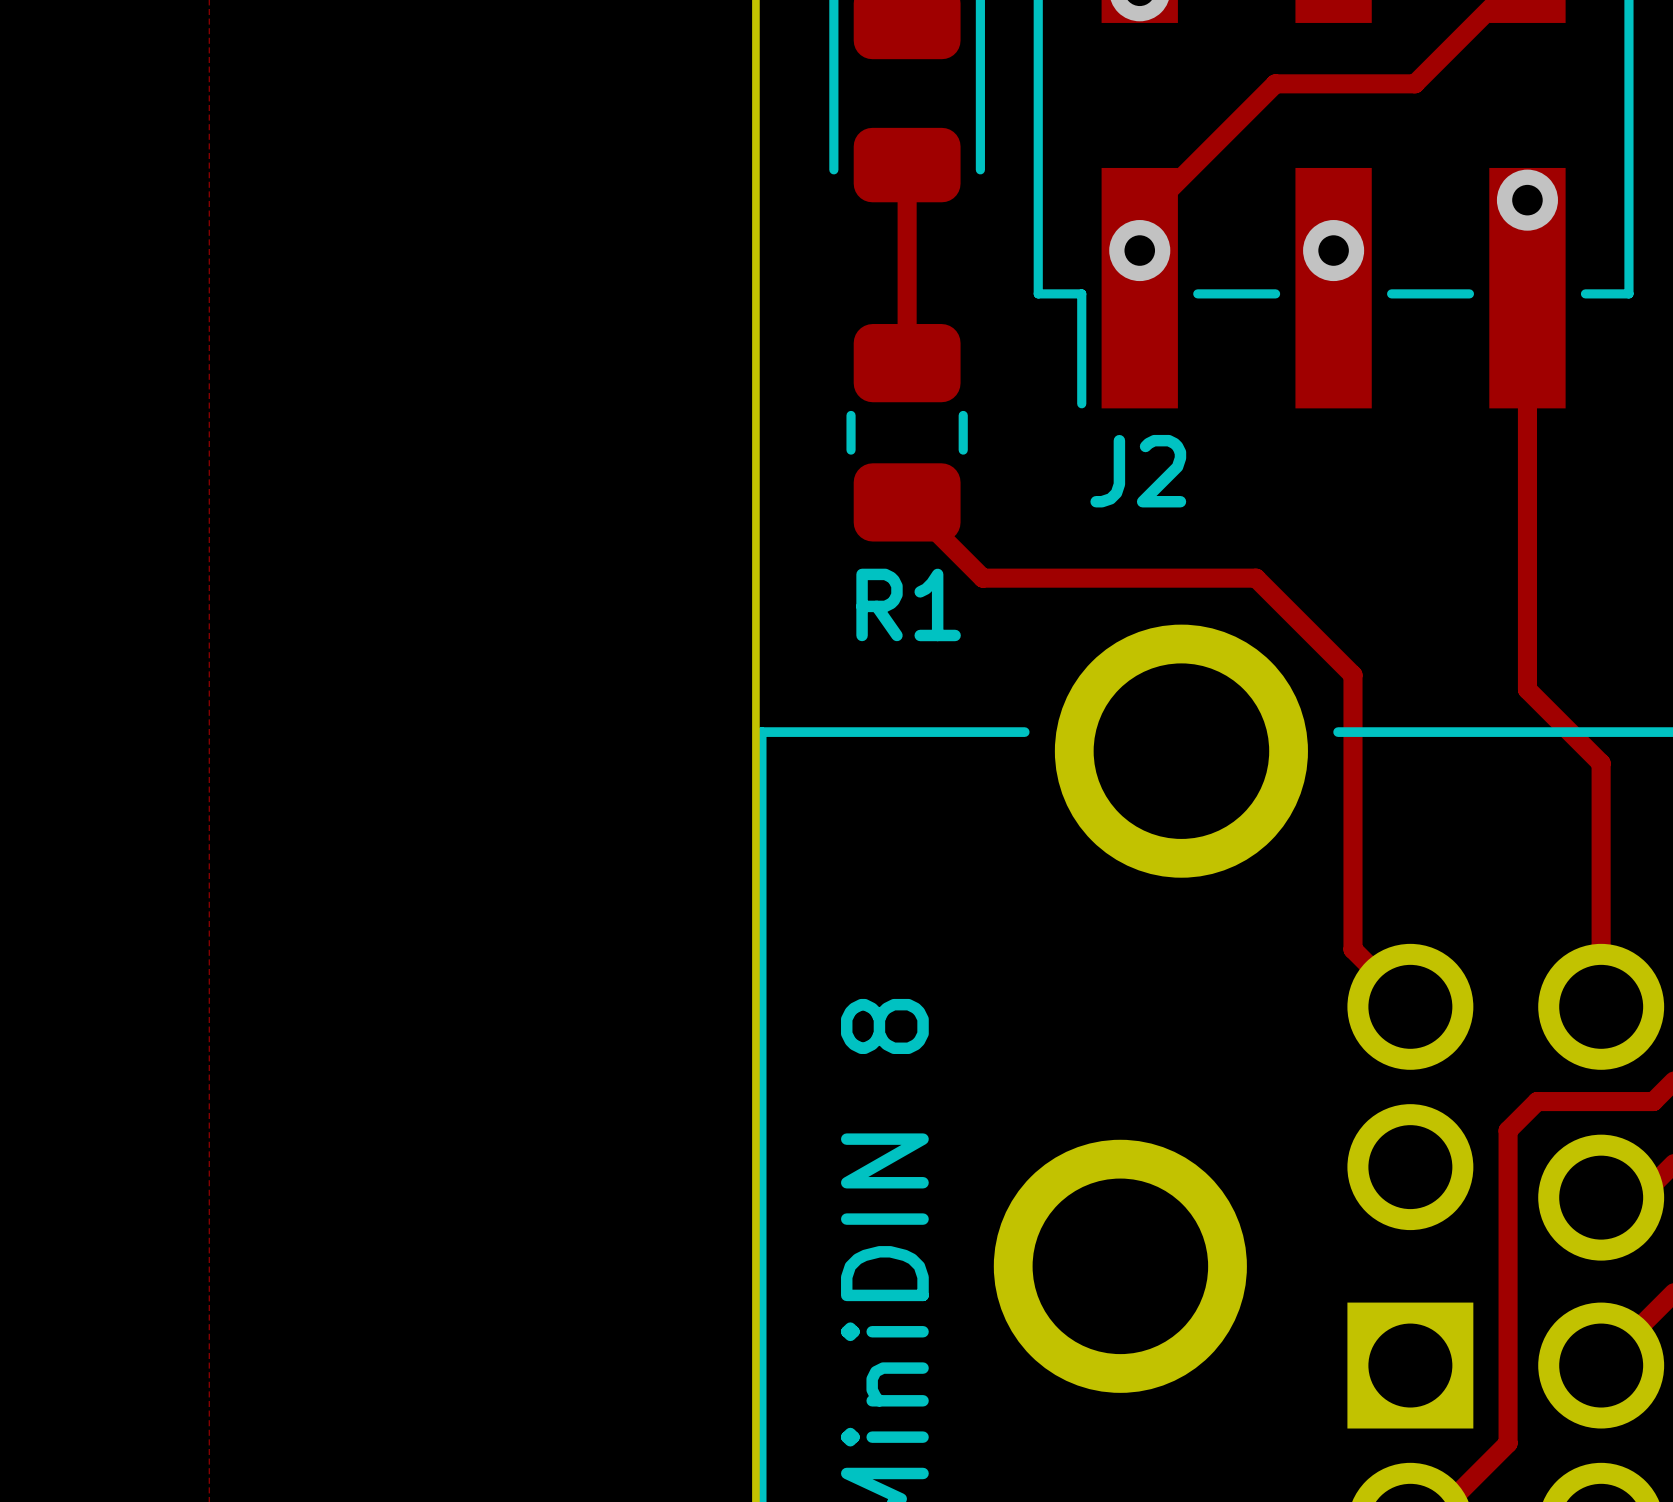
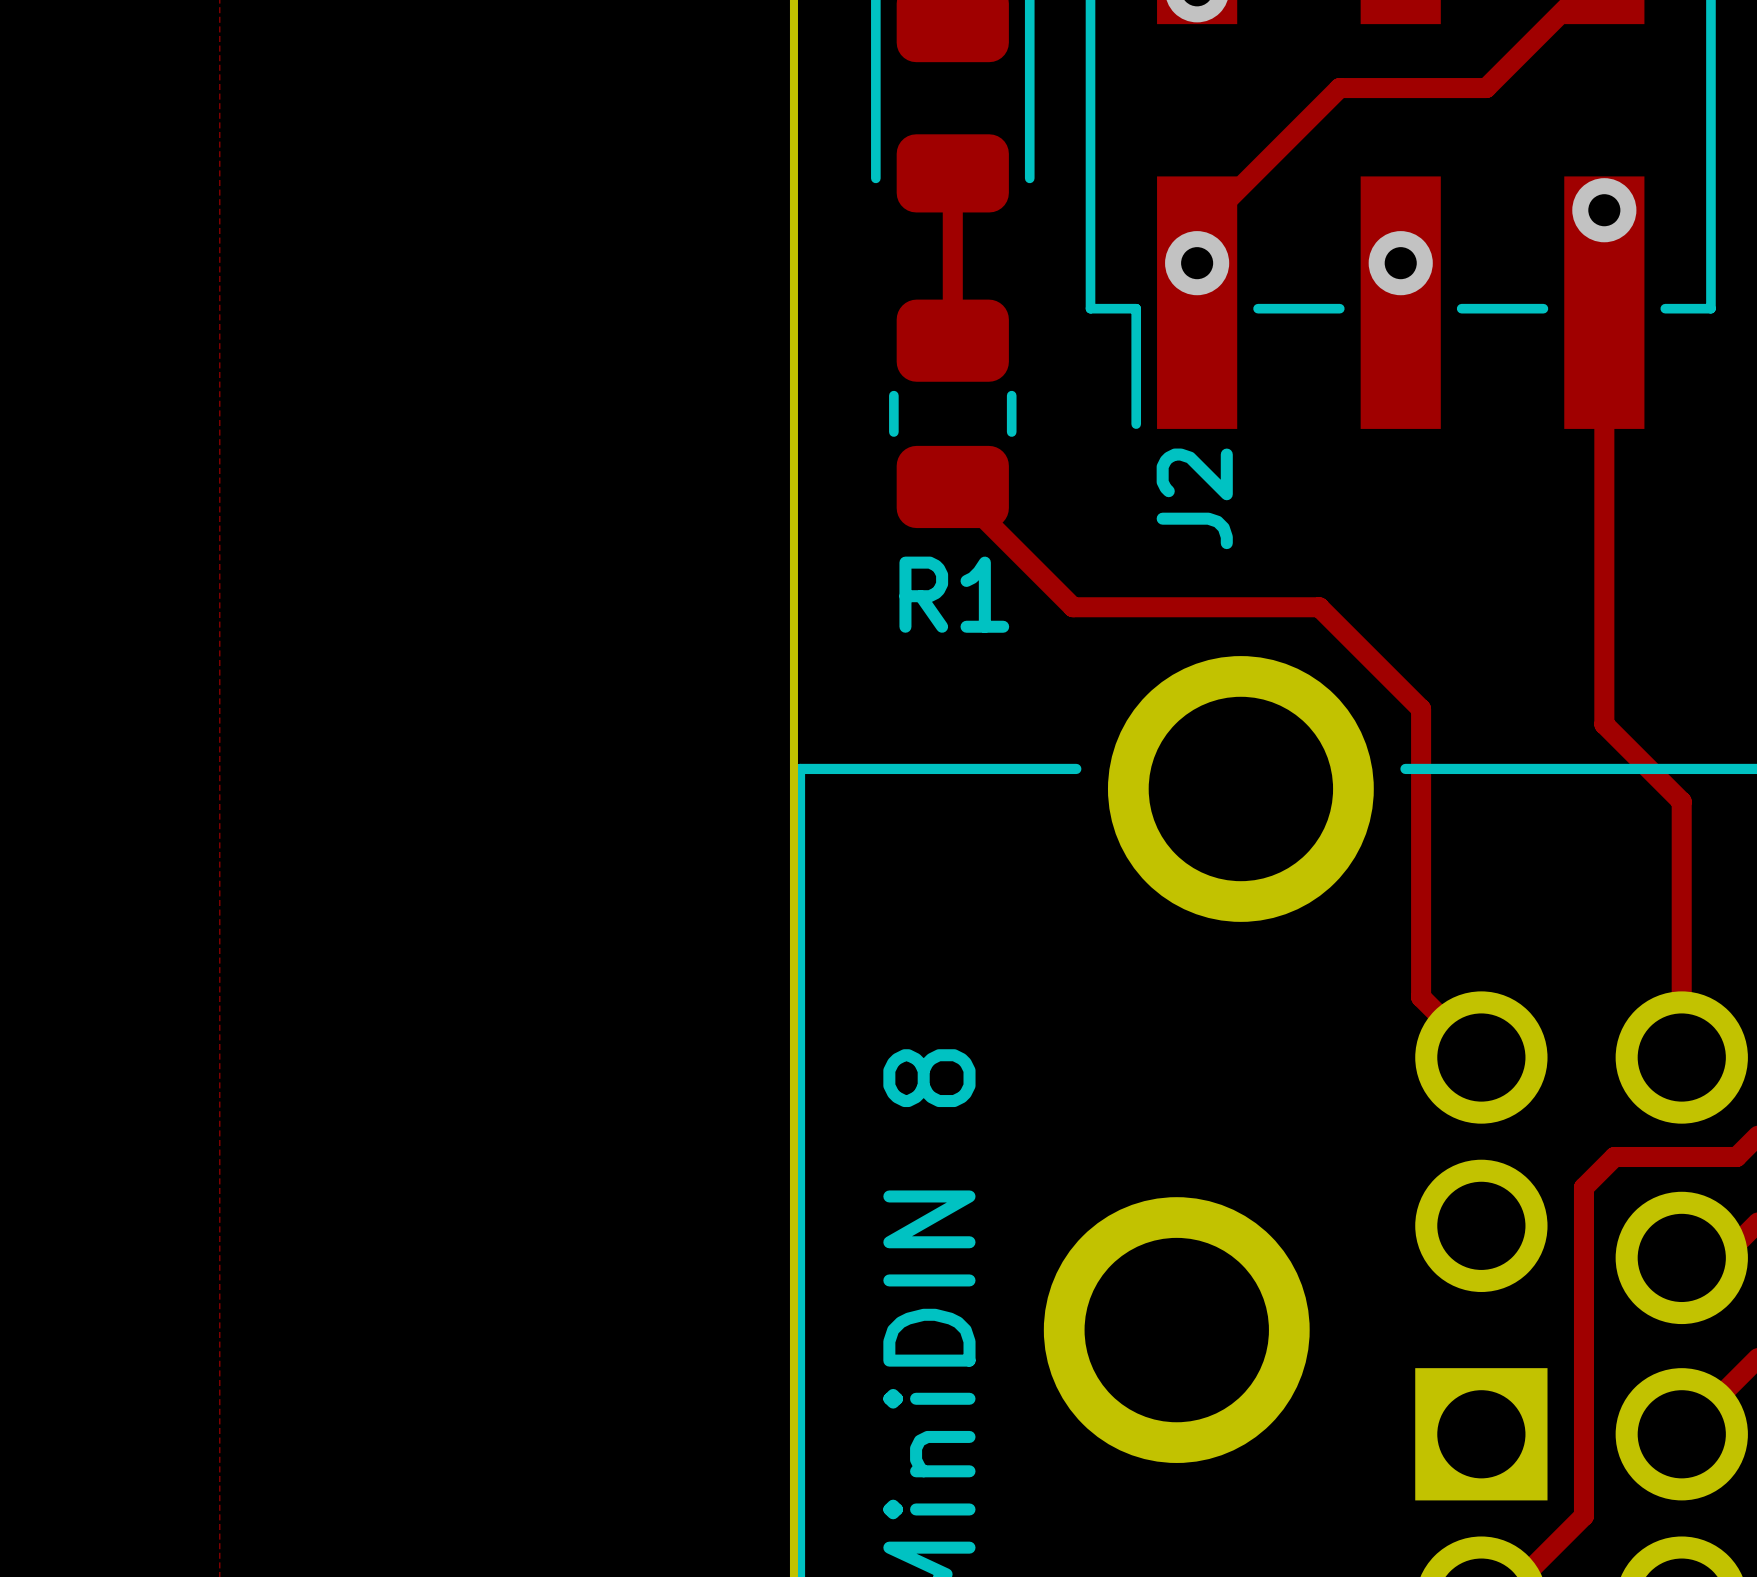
R1 position: (907, 432) -> (952, 413)
J2 name rotation: 0° (1138, 471) -> 90° counterclockwise (1194, 498)
track: (907, 502) (982, 578) (1021, 578) -> (952, 486) (1073, 607)

